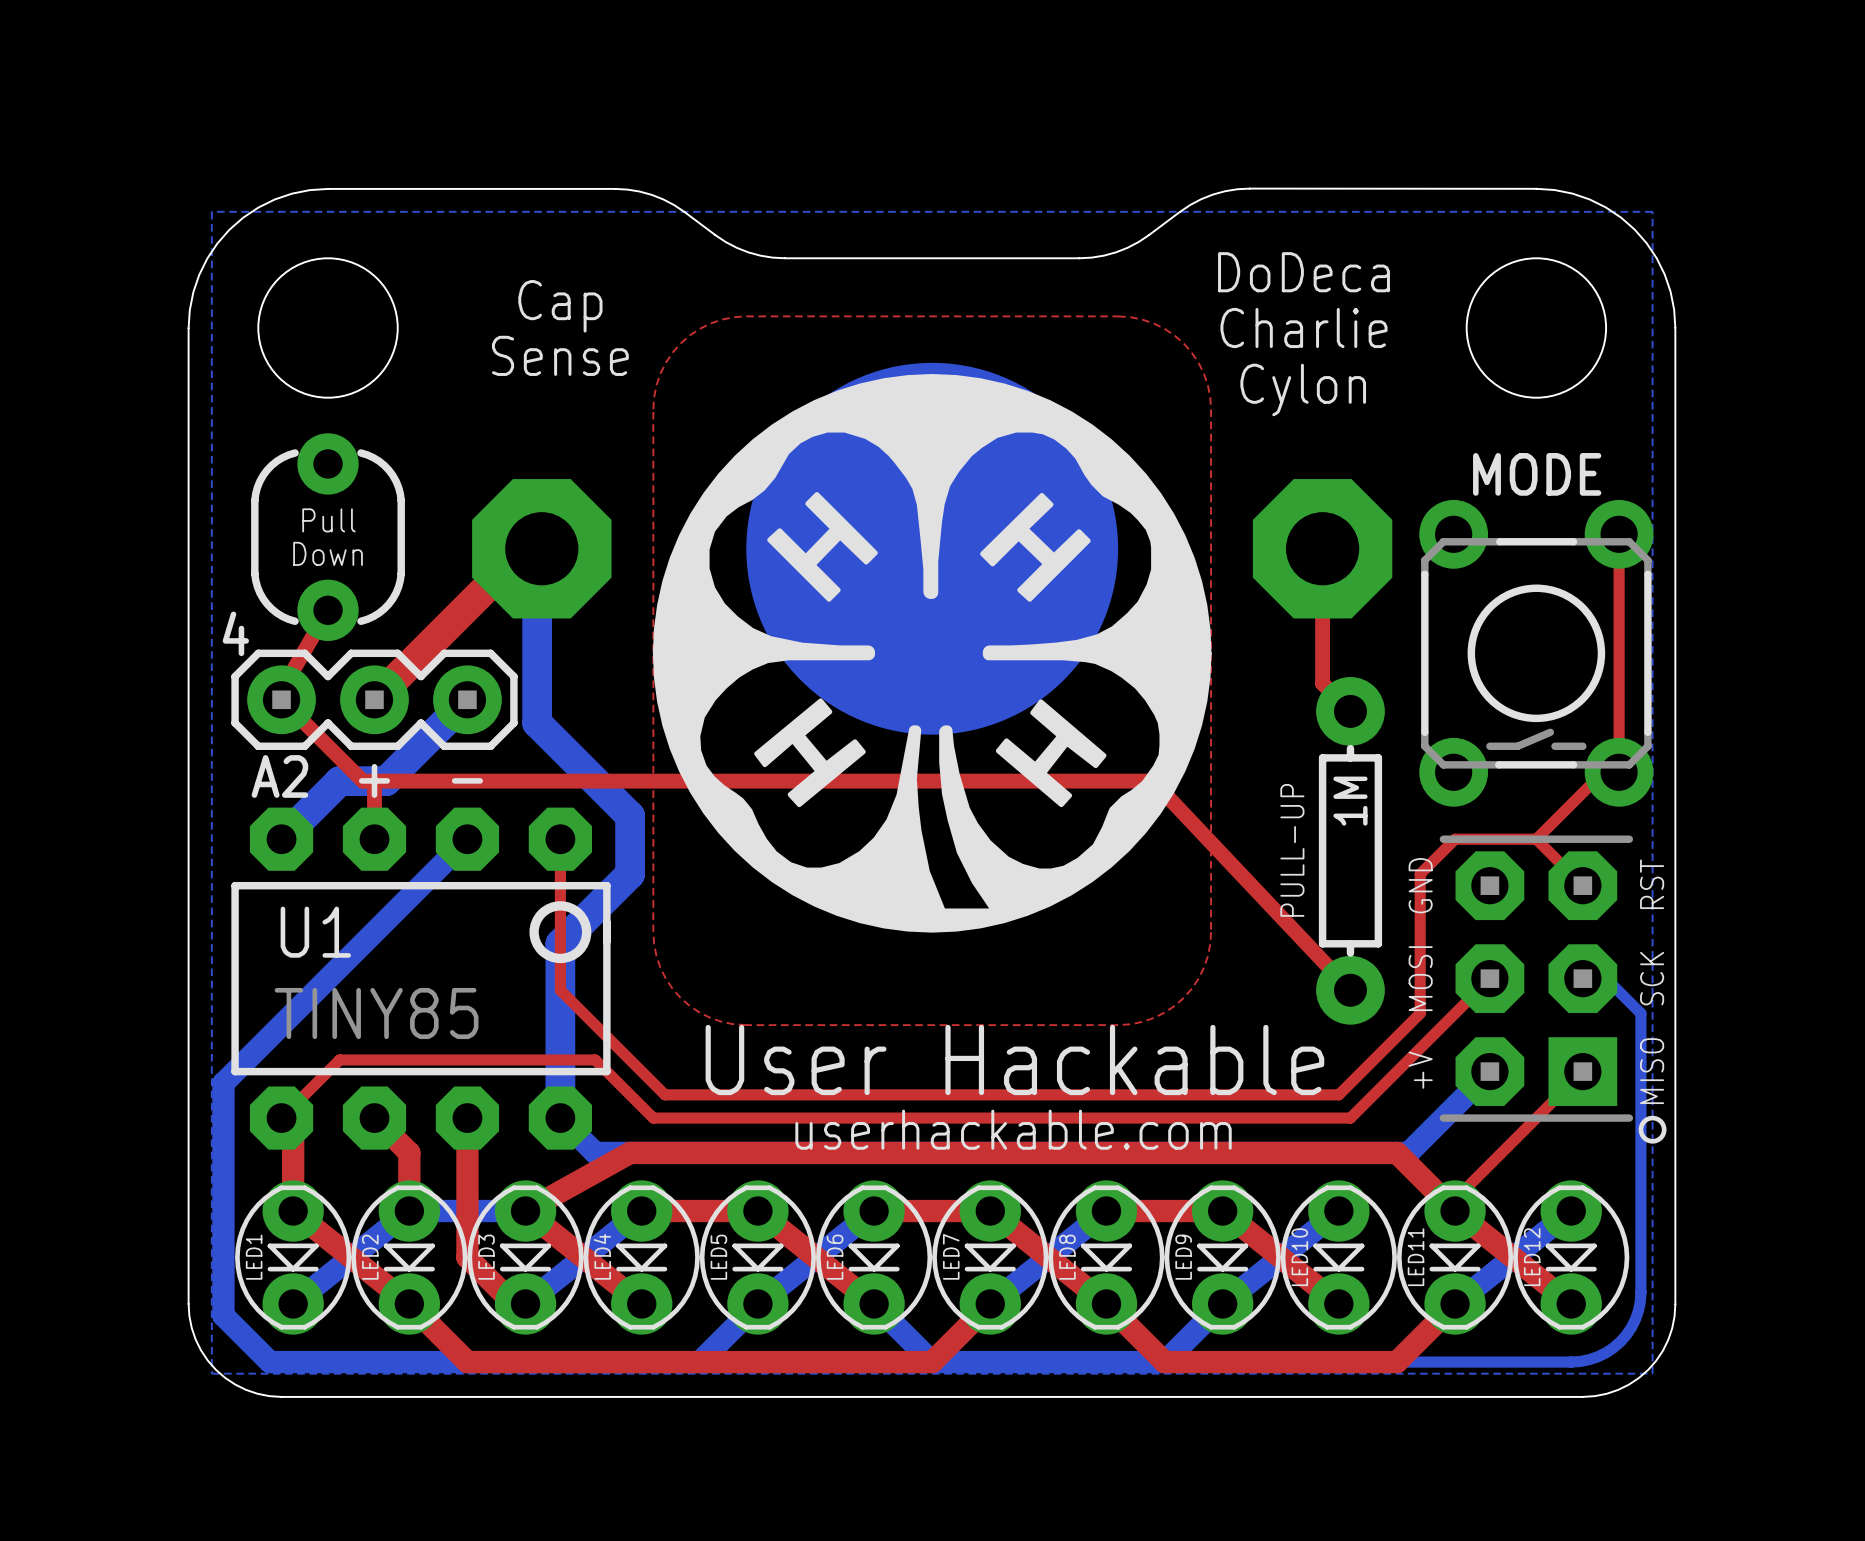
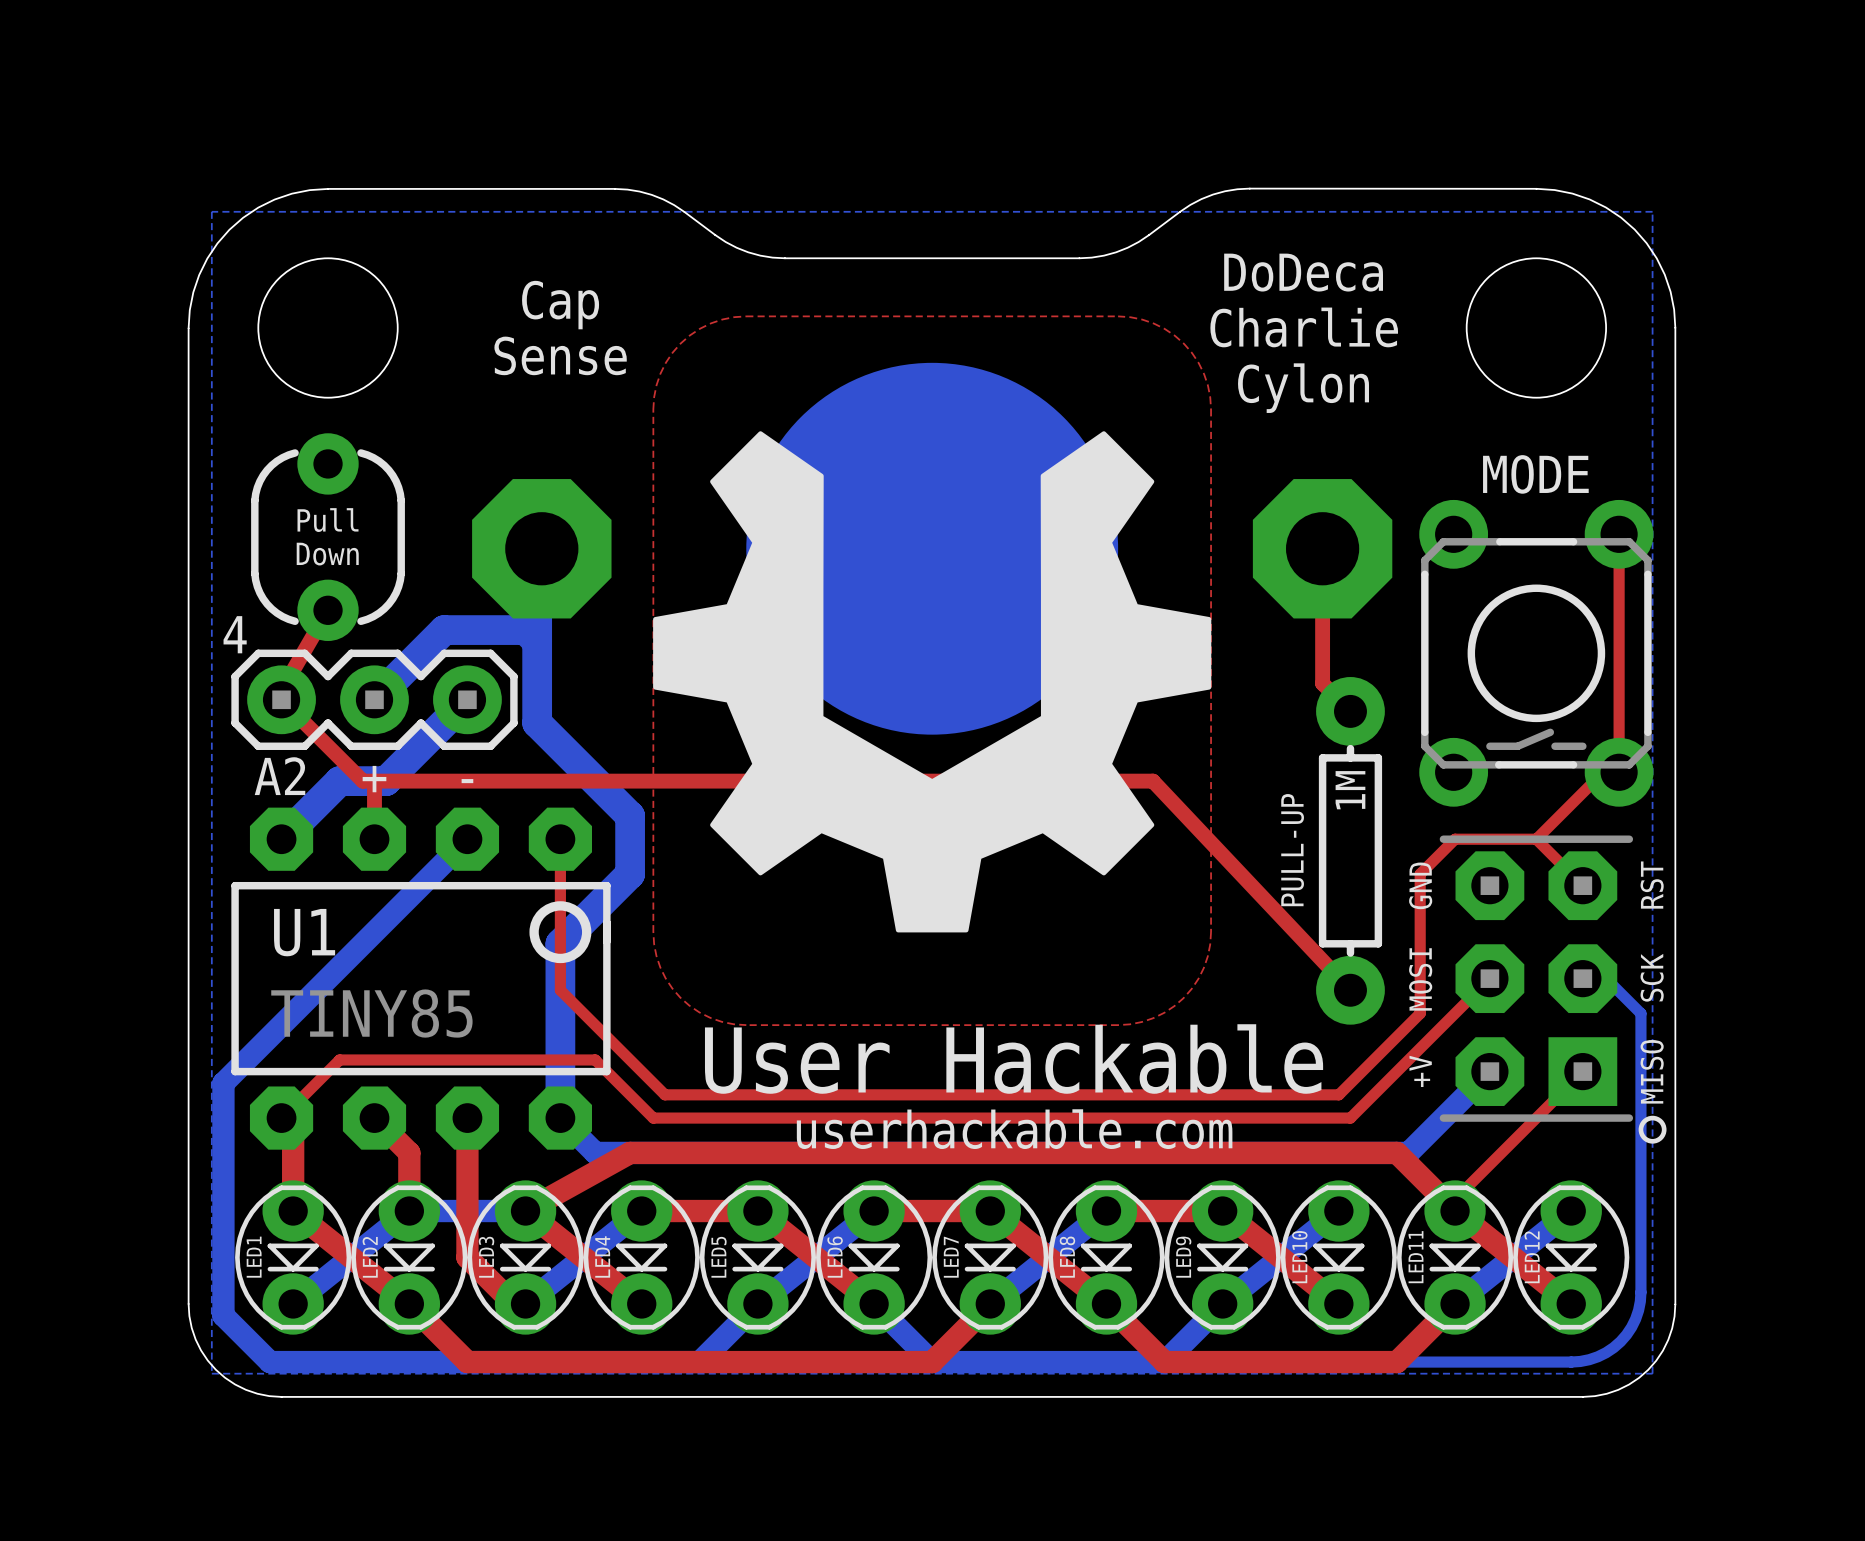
drawing shape: [652, 374, 1212, 933] -> [653, 431, 1212, 933]
top track: (541, 548) (525, 548) (374, 699) -> none
bottom track: none -> (537, 641) (525, 630) (444, 630) (374, 699)

